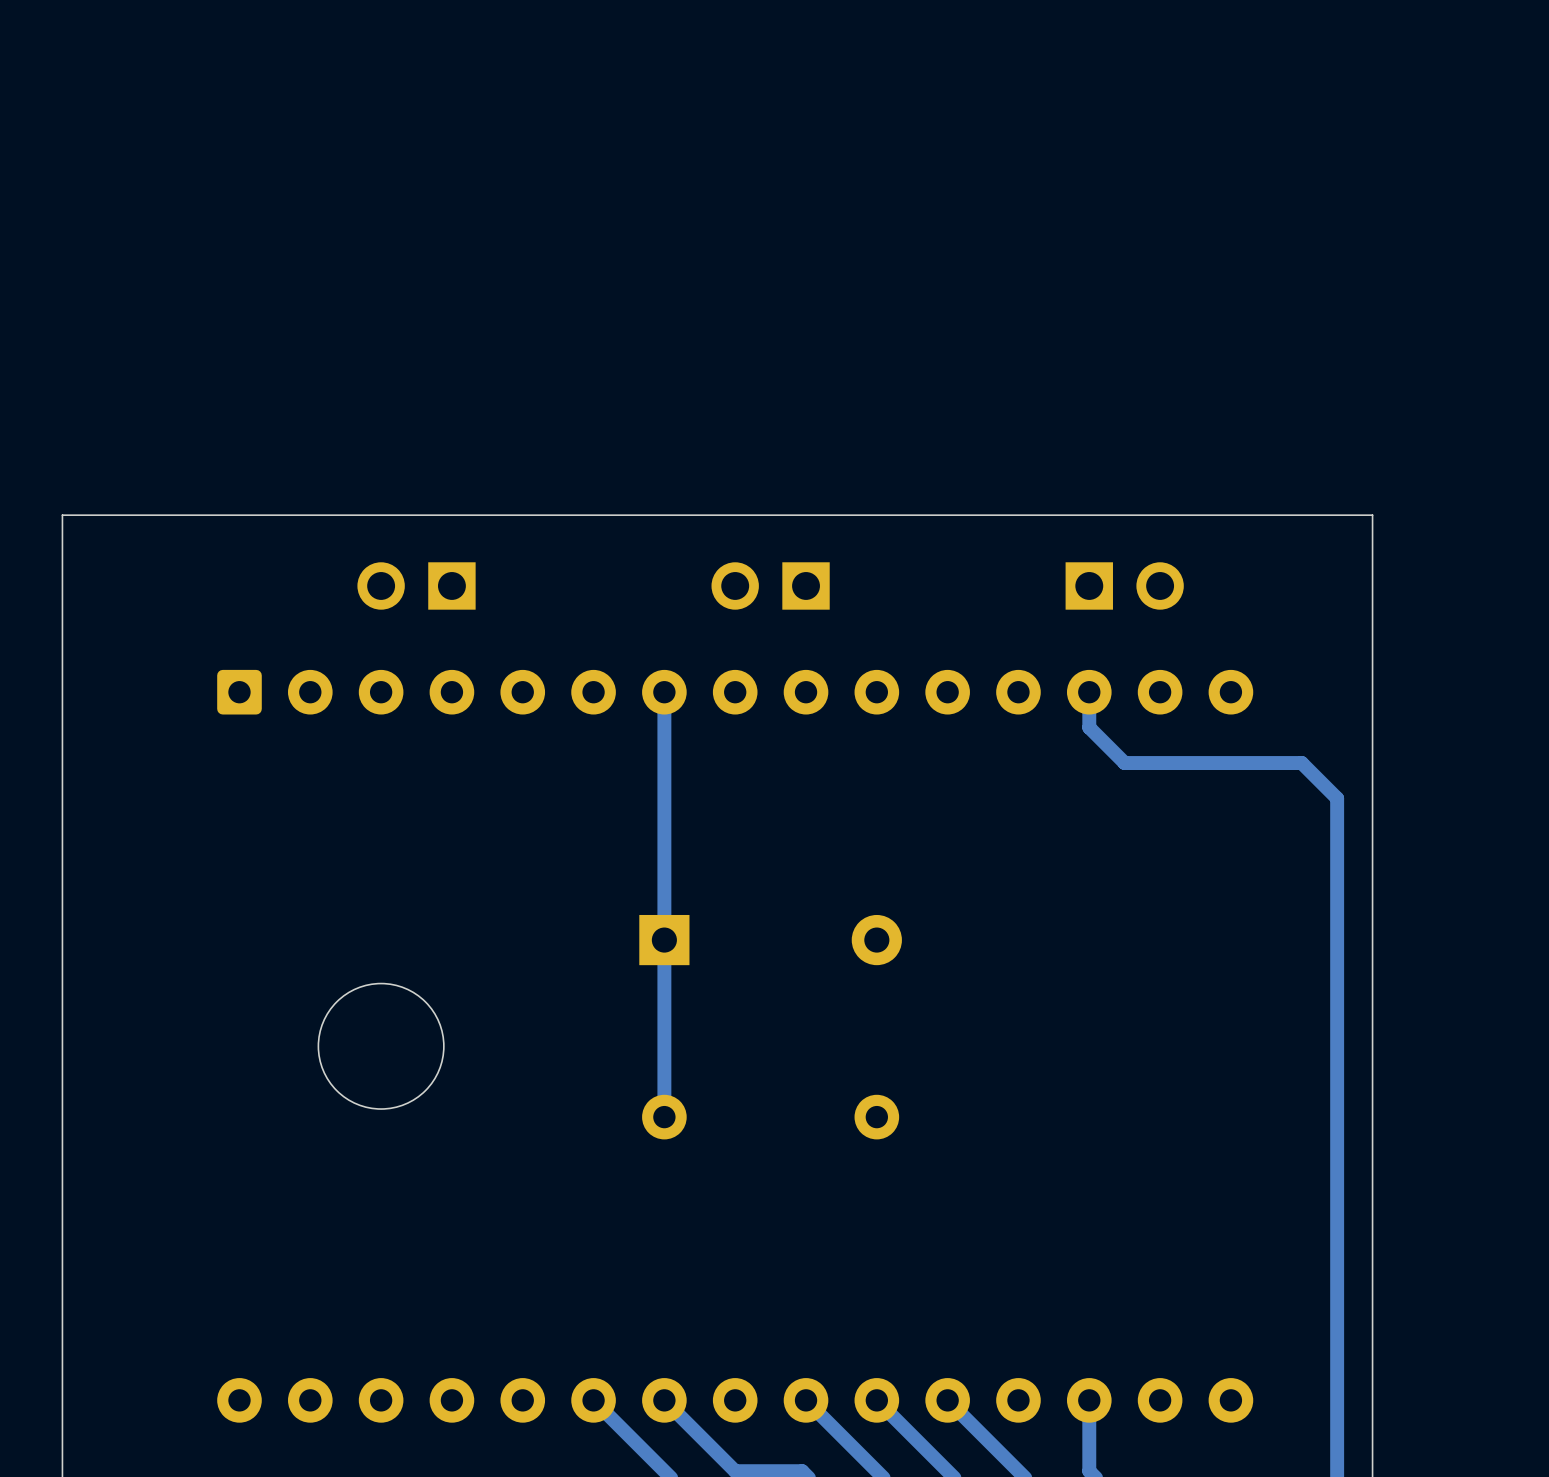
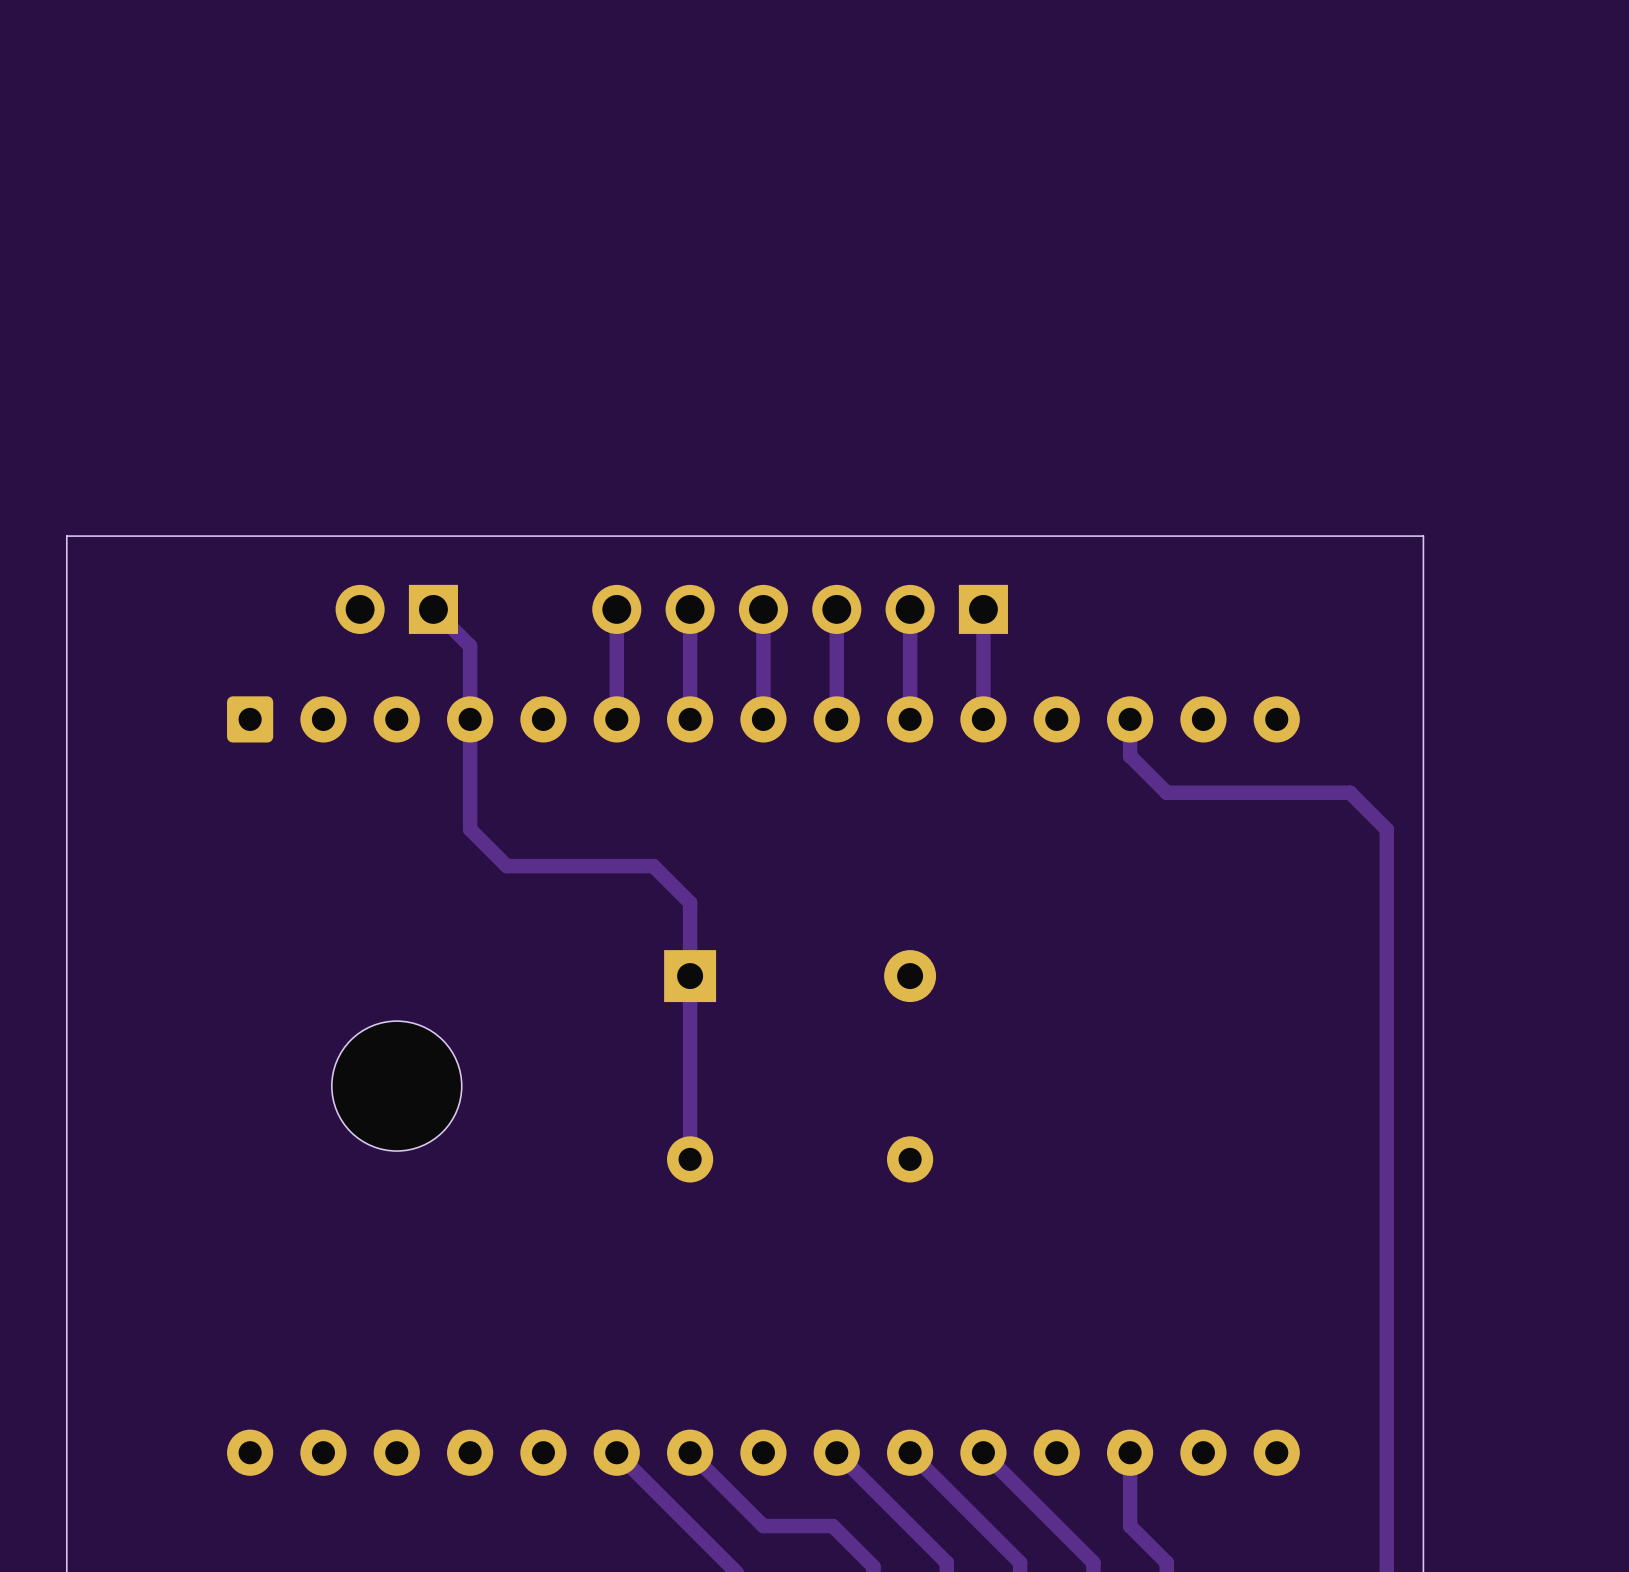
part footprint: [711, 562, 830, 610] -> [592, 584, 1008, 634]
part position: (416, 585) -> (396, 609)
track: none -> (616, 609) (616, 719)
track: none -> (690, 609) (690, 719)
track: none -> (763, 609) (763, 719)
track: none -> (836, 609) (836, 719)
track: none -> (910, 609) (910, 719)
track: none -> (983, 609) (983, 719)
part: (1124, 585) -> none
track: (664, 692) (664, 869) -> (433, 609) (470, 646) (470, 829) (506, 866) (653, 866) (690, 902)

